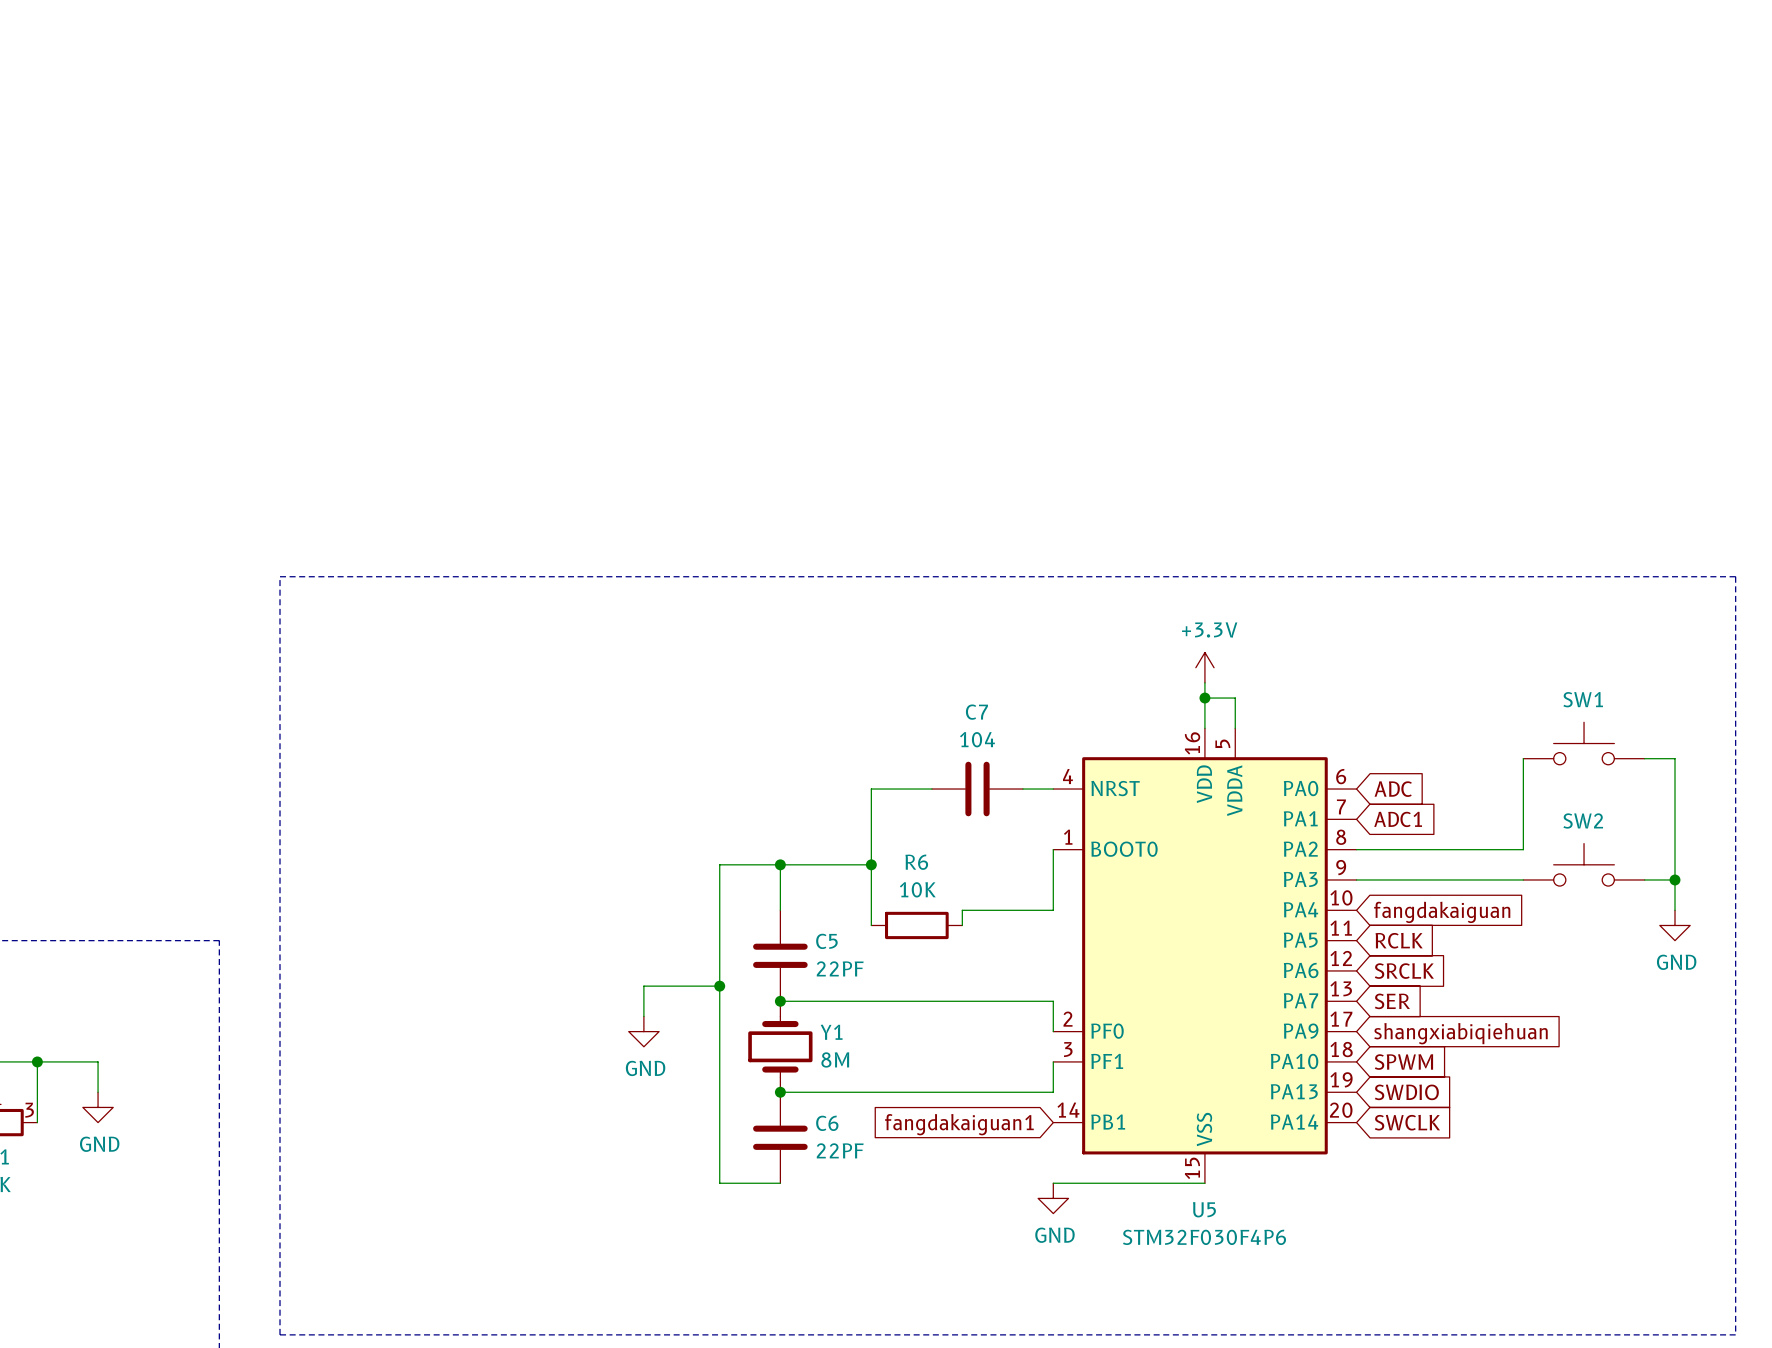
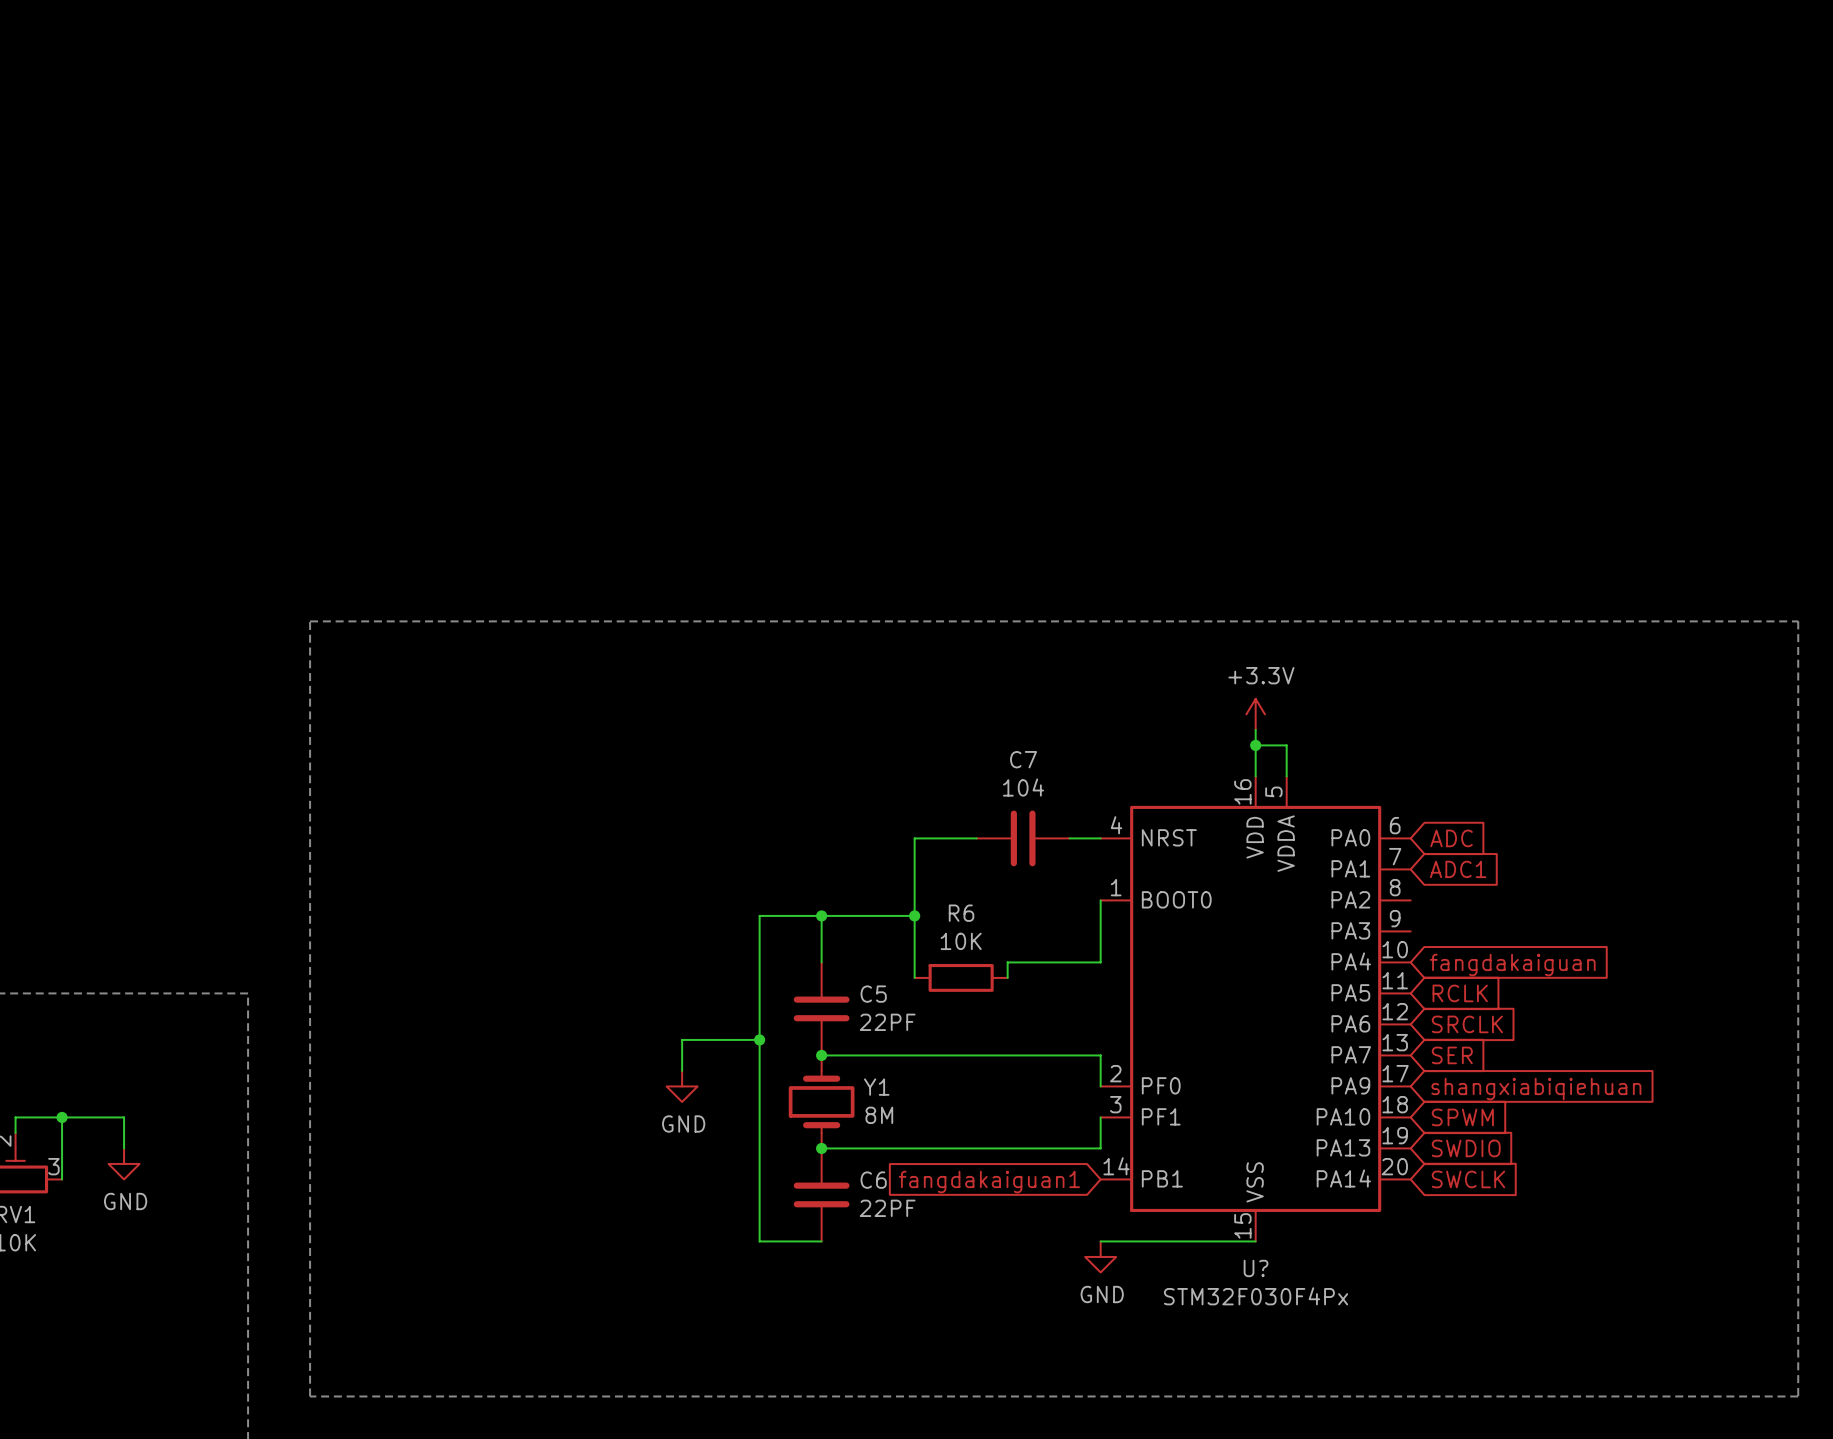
SW1: (1584, 743) -> none
wire: (1523, 758) (1523, 849) (1356, 849) -> none
wire: (1644, 758) (1675, 758) (1675, 910) -> none
SW2: (1584, 864) -> none
wire: (1356, 879) (1523, 879) -> none
wire: (1644, 879) (1675, 879) -> none
junction: (1675, 879) -> none
power symbol: GND (1675, 925) -> none
U5 name: U5 (1204, 1209) -> U? (1256, 1268)
U5 value: STM32F030F4P6 (1204, 1237) -> STM32F030F4Px (1256, 1296)

